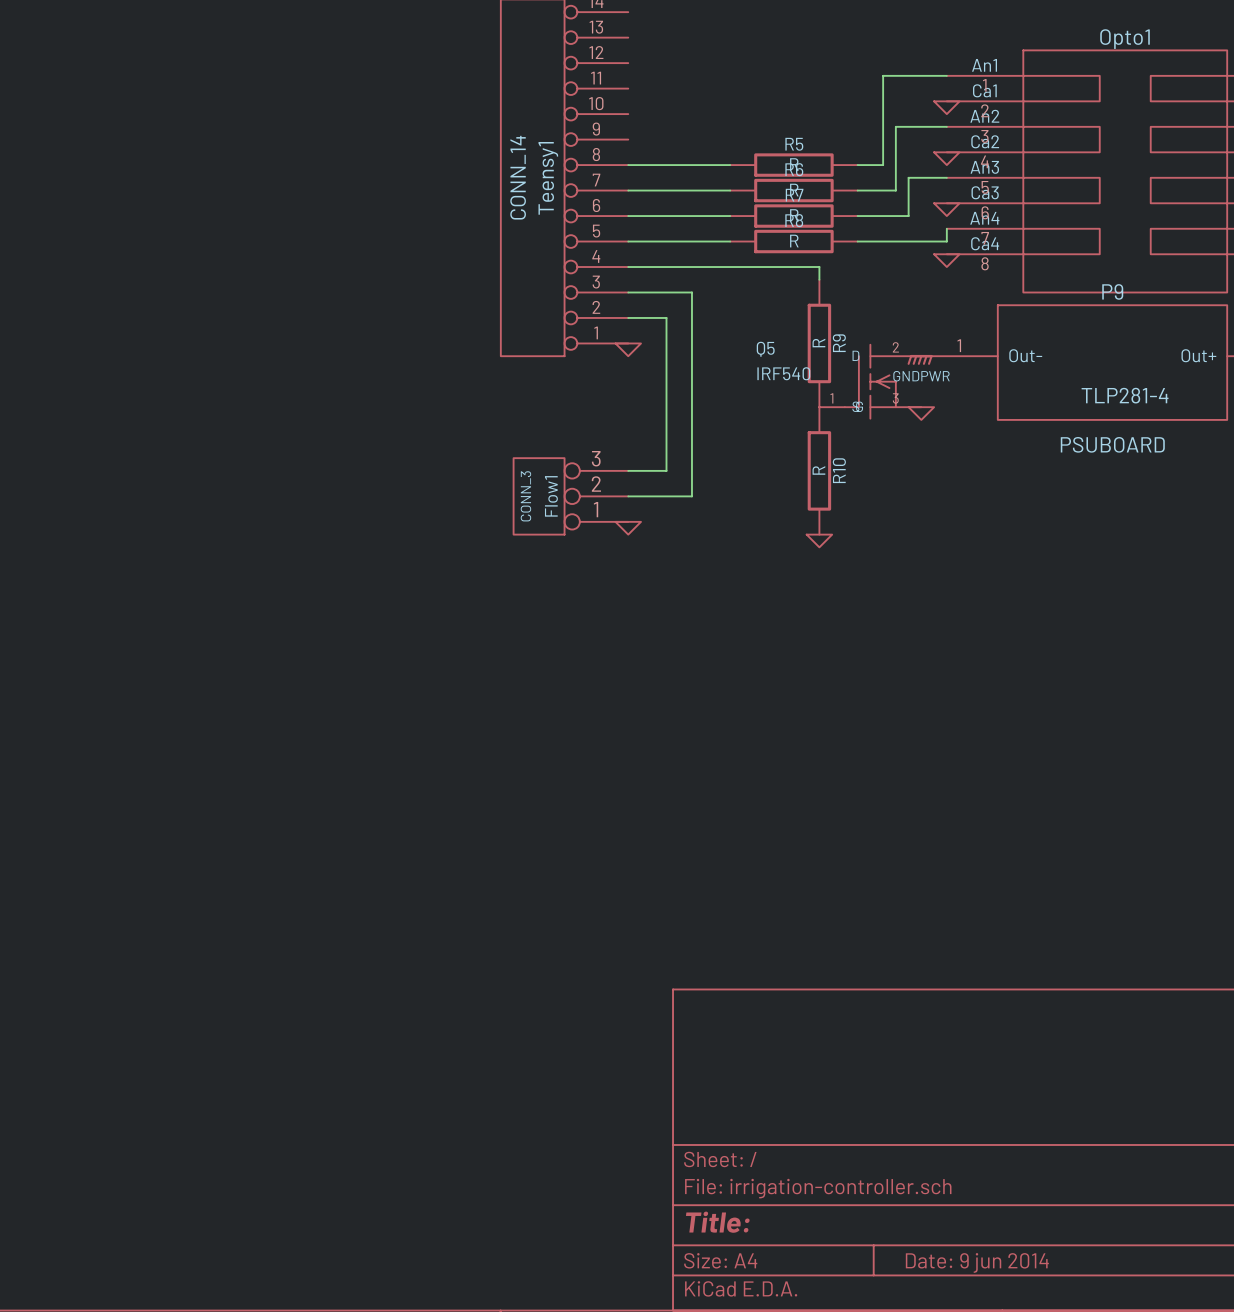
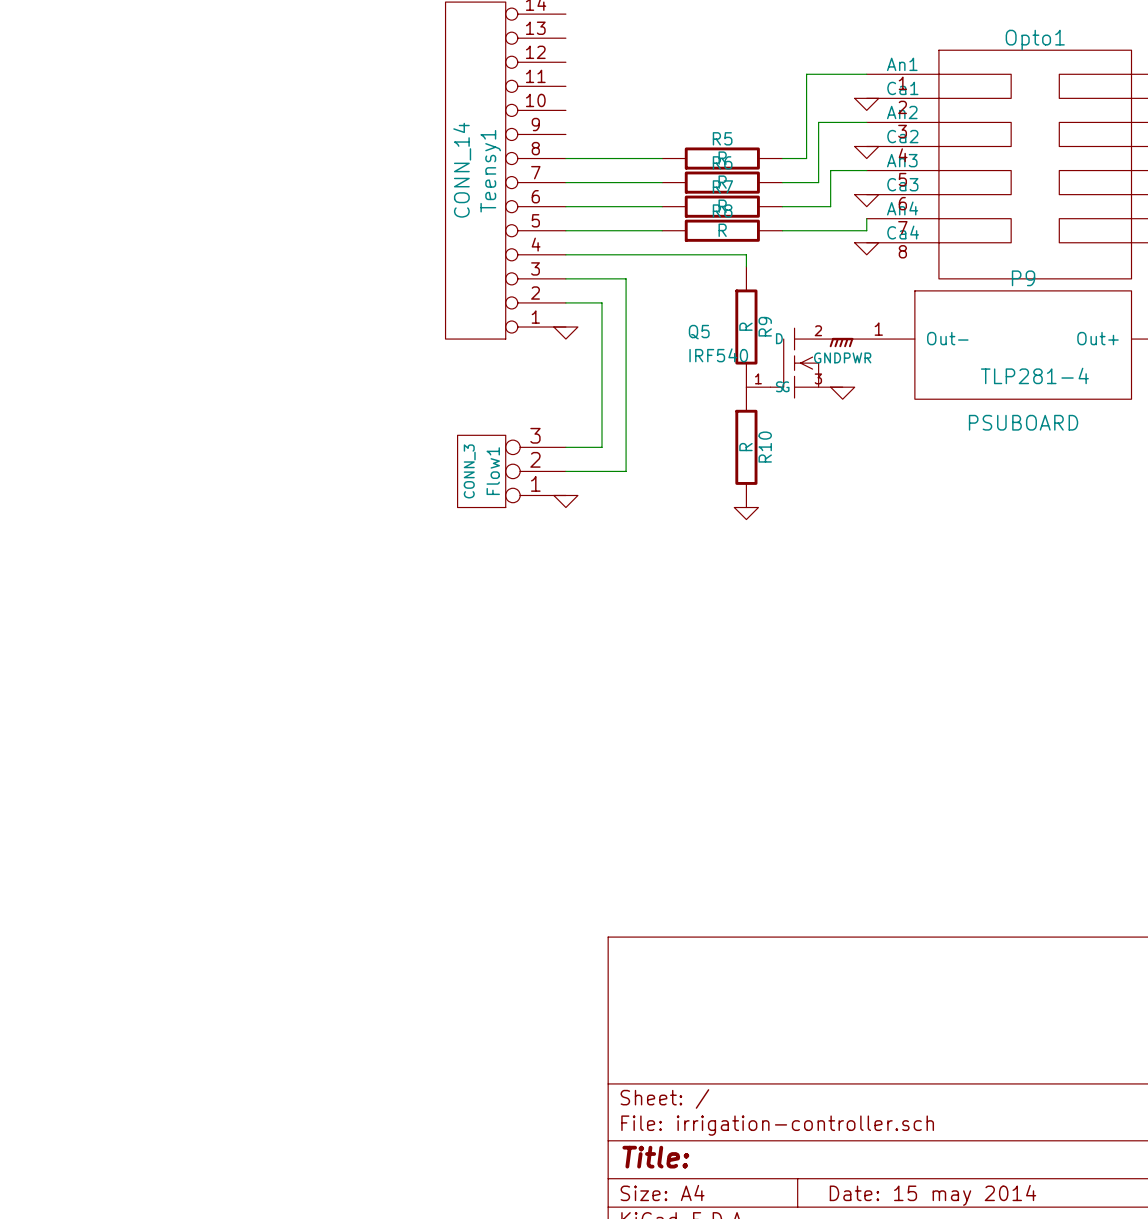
title block: Date: 9 jun 2014 (977, 1262) -> Date: 15 may 2014 (932, 1195)

